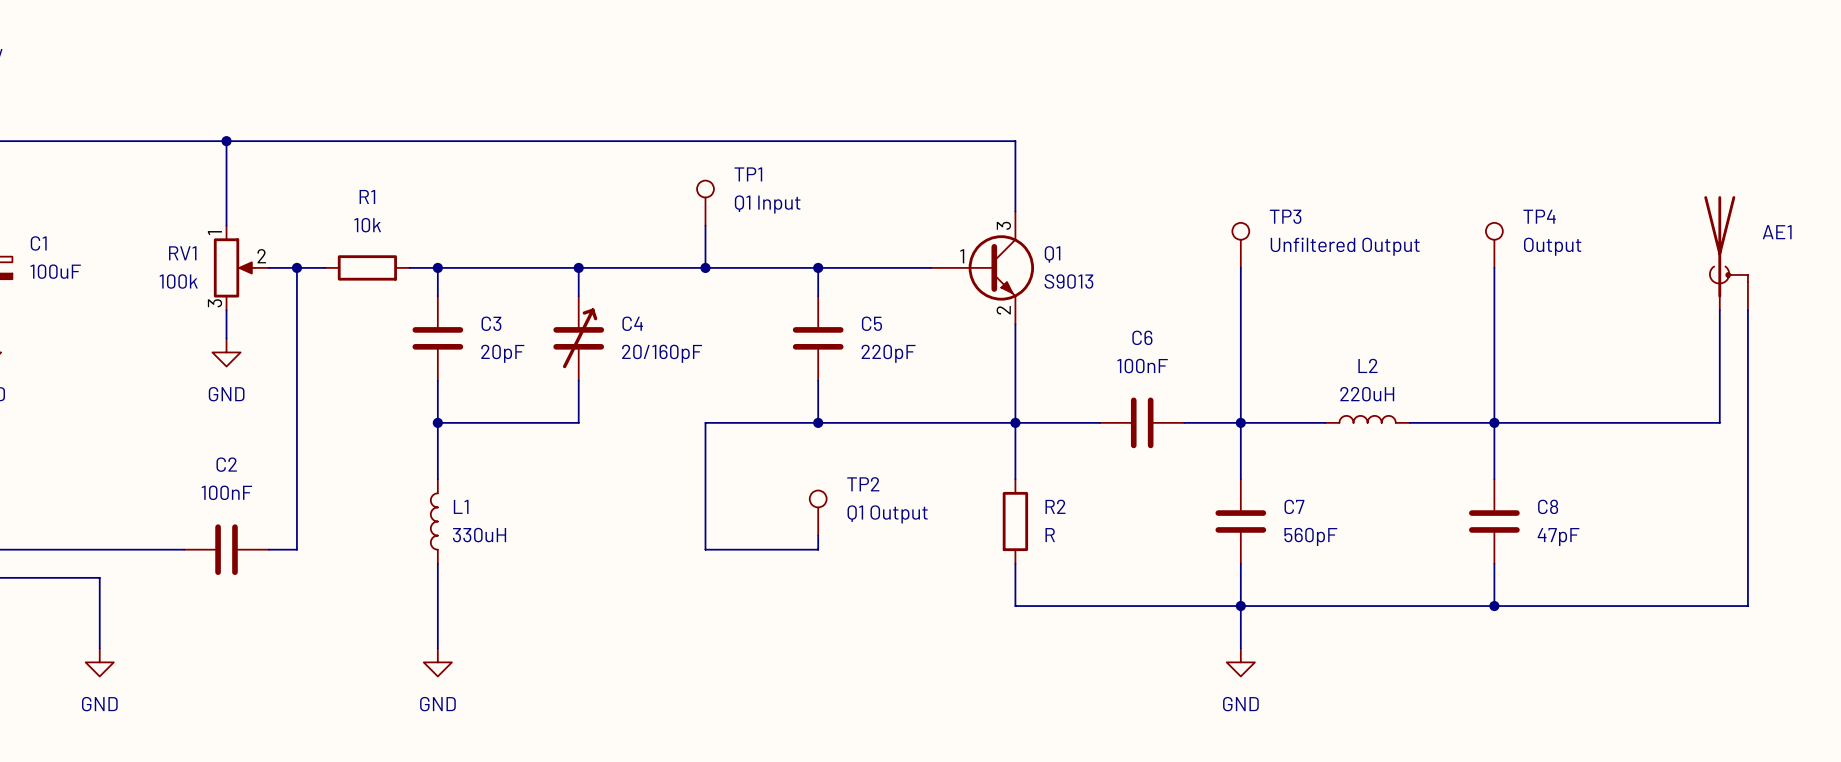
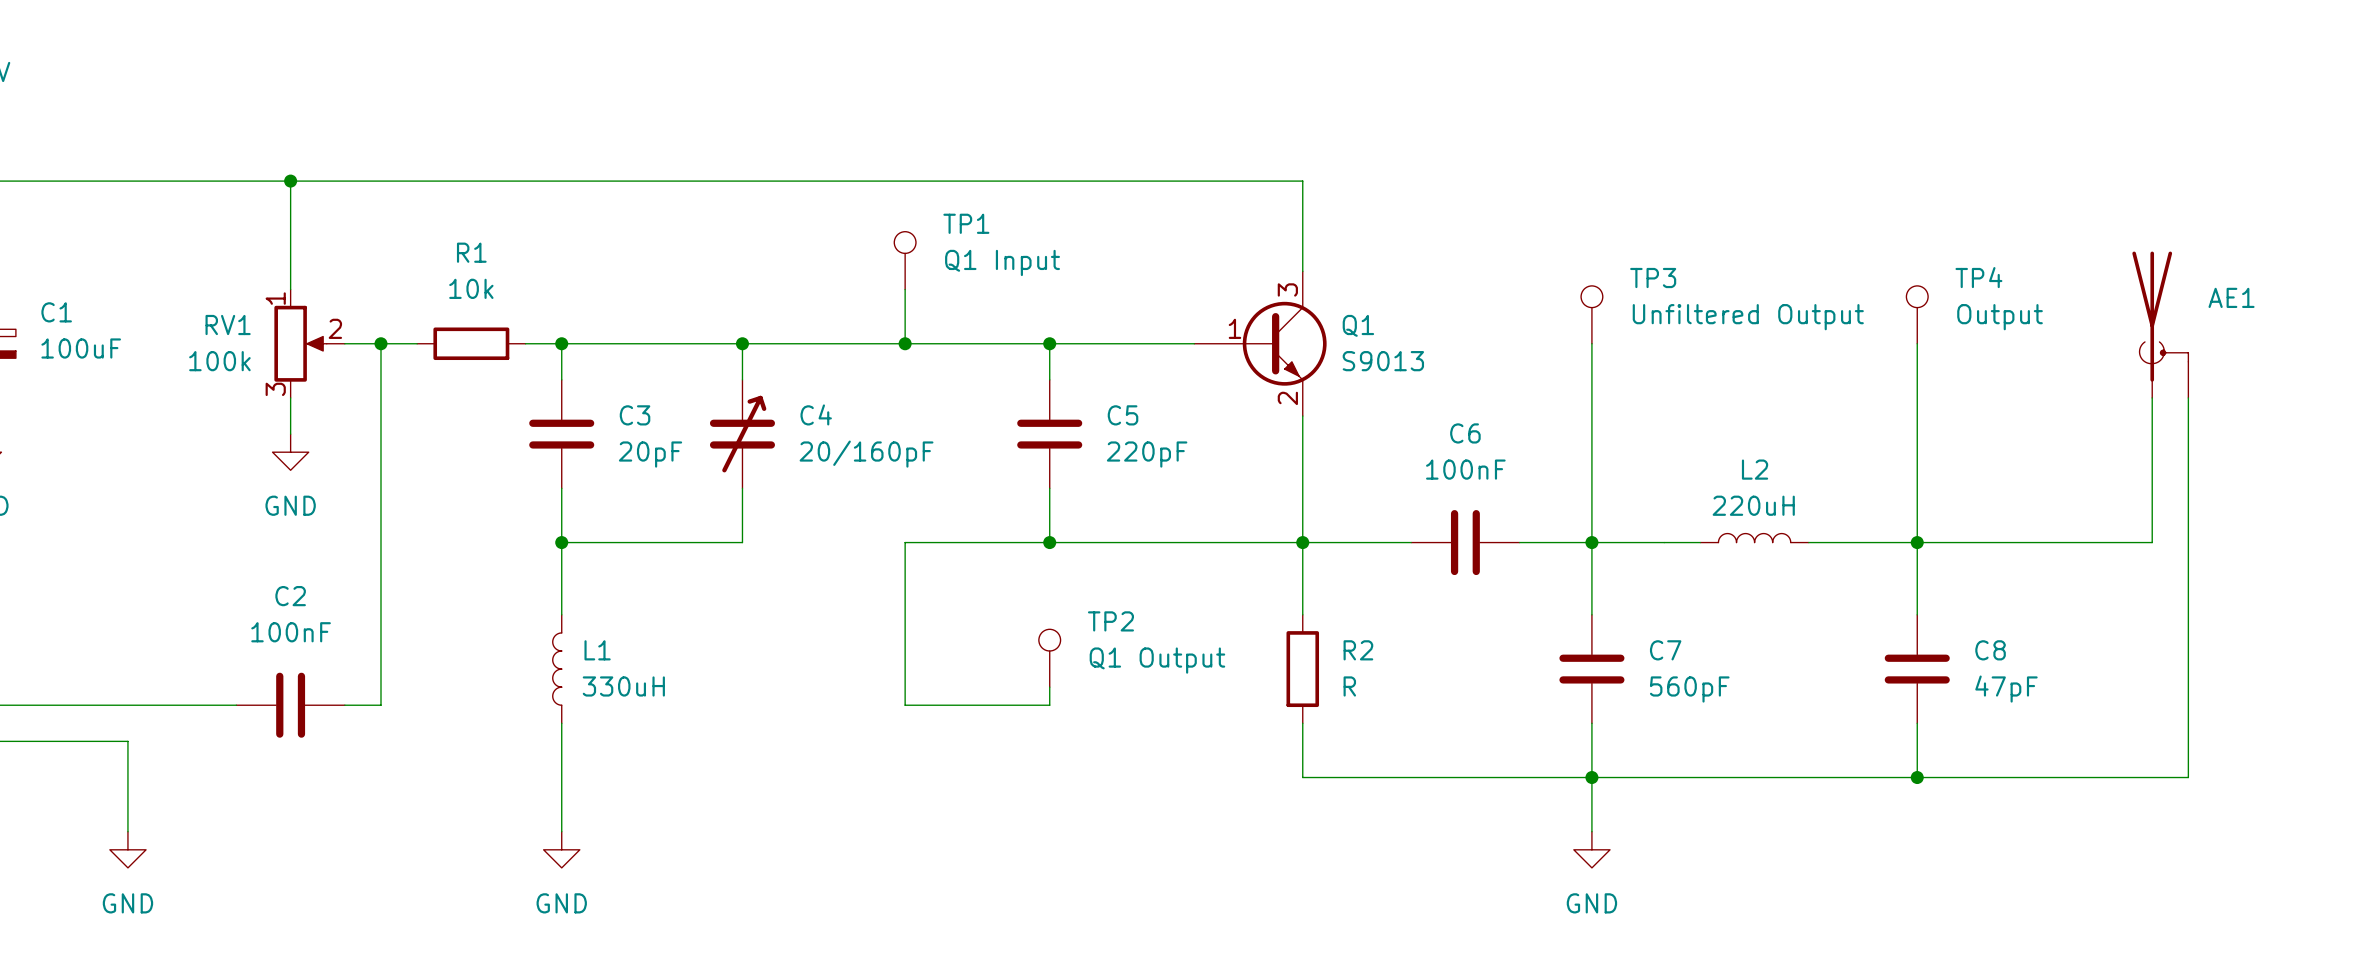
AE1 position: (1726, 253) -> (2160, 324)
wire: (1719, 310) (1719, 422) (1677, 422) -> (2152, 397) (2152, 542)
wire: (1747, 310) (1747, 606) (1705, 606) -> (2188, 397) (2188, 777)

